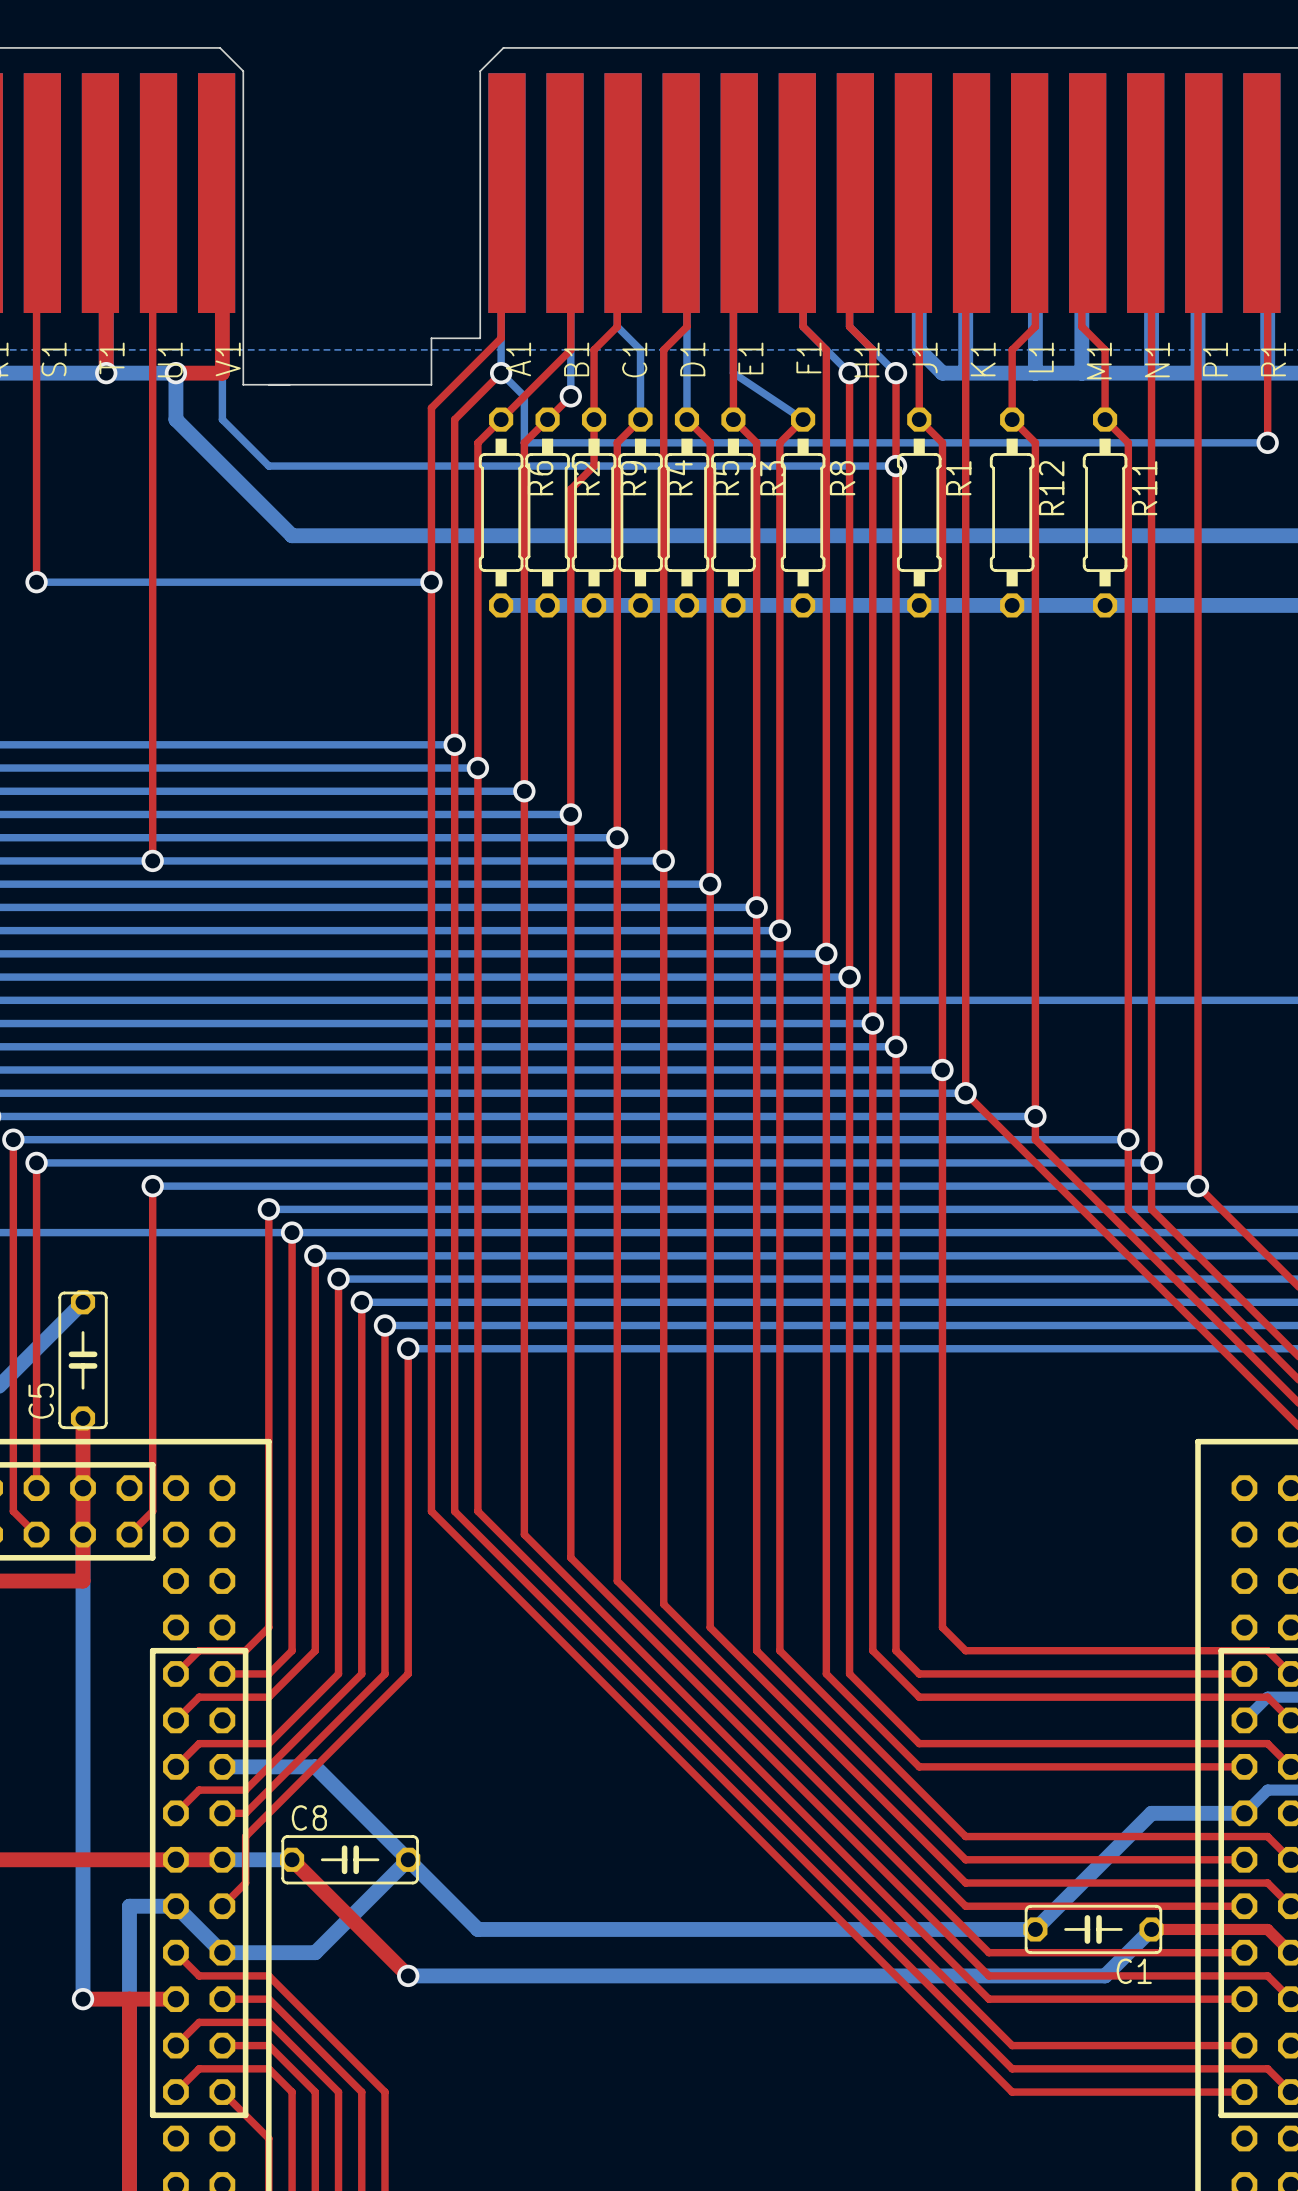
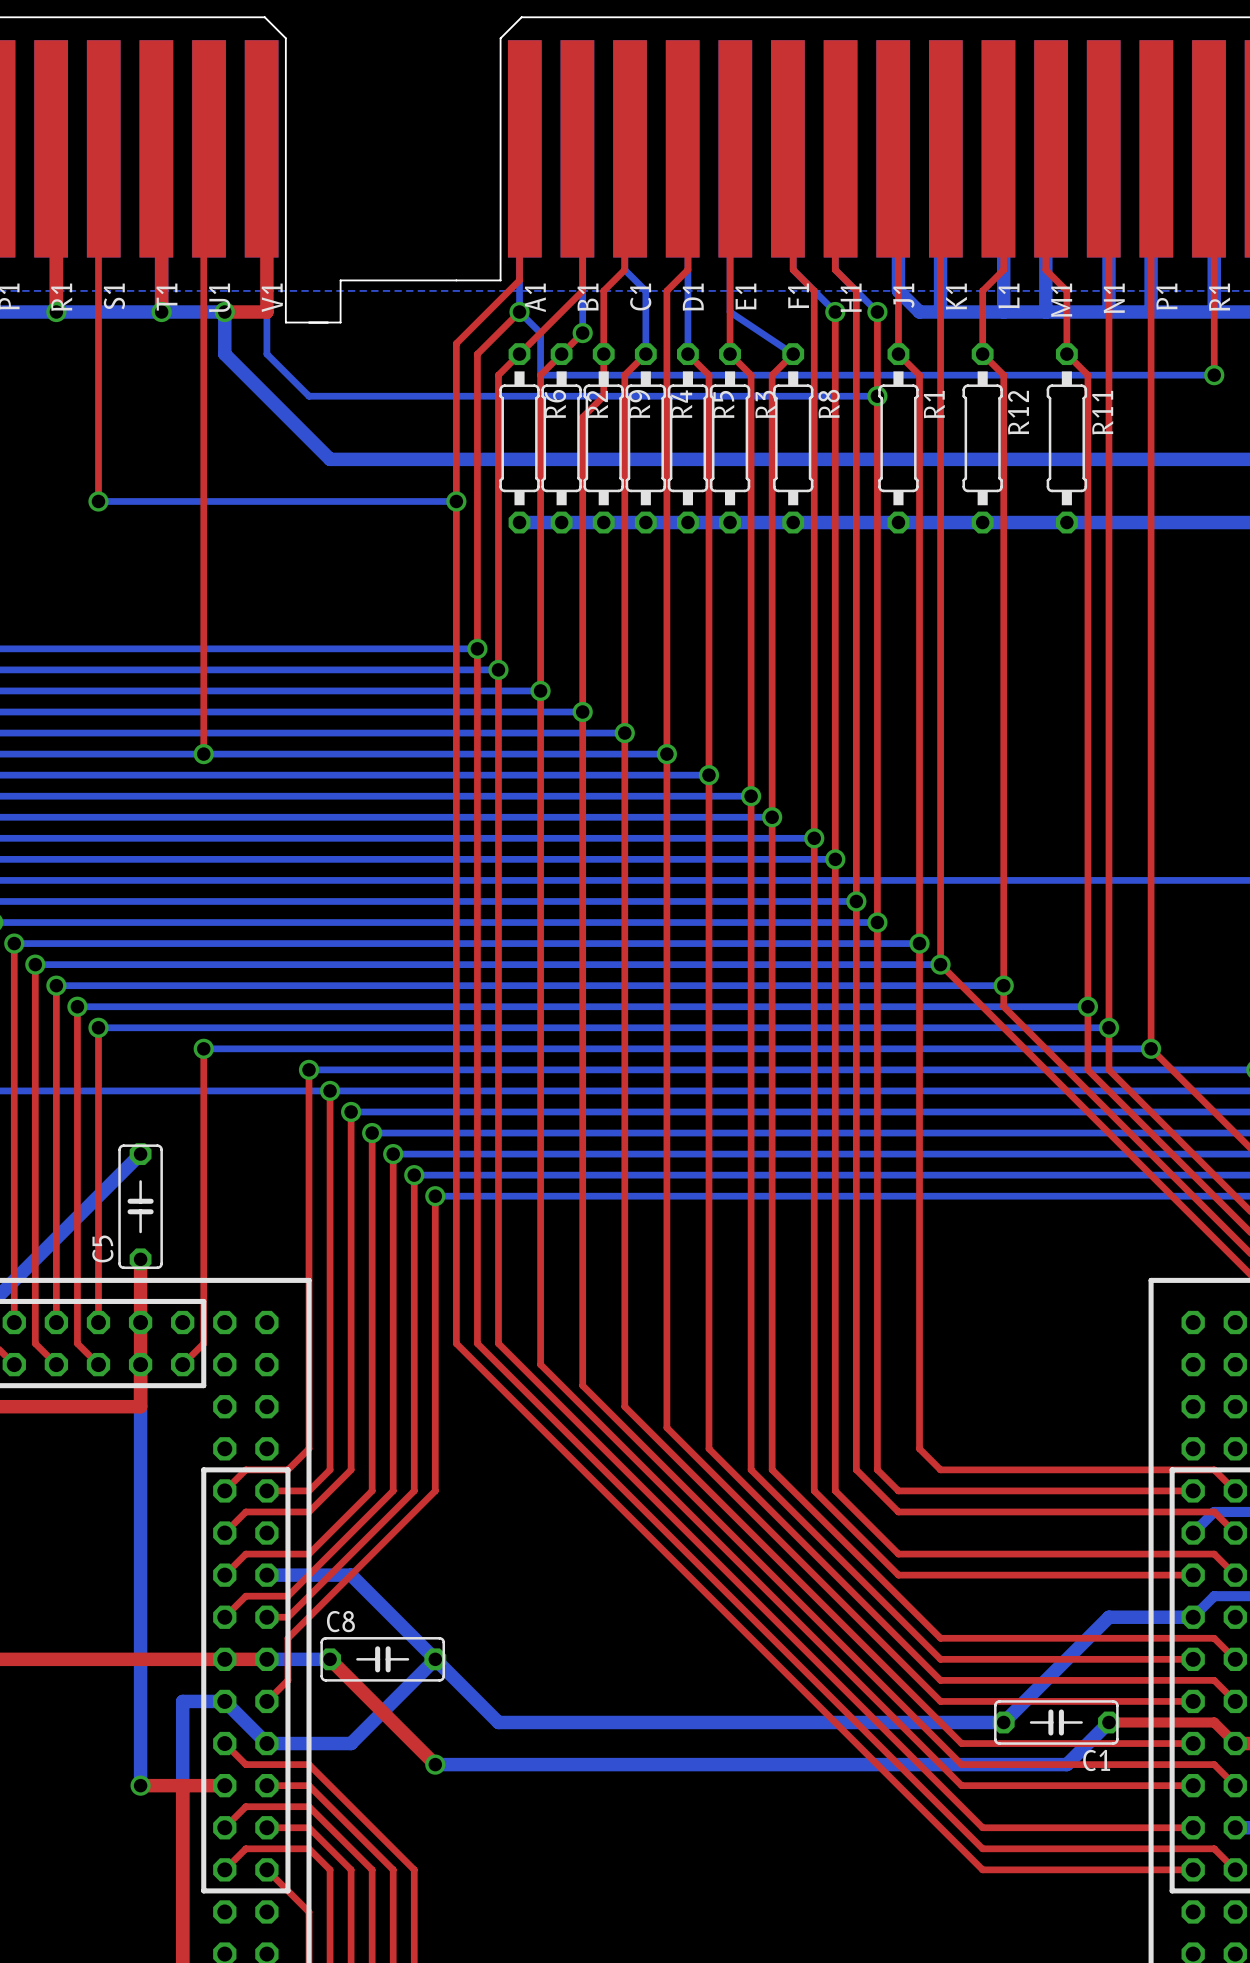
board edge: (431, 338) (431, 384) (303, 384) -> (456, 280) (340, 280) (340, 322)

